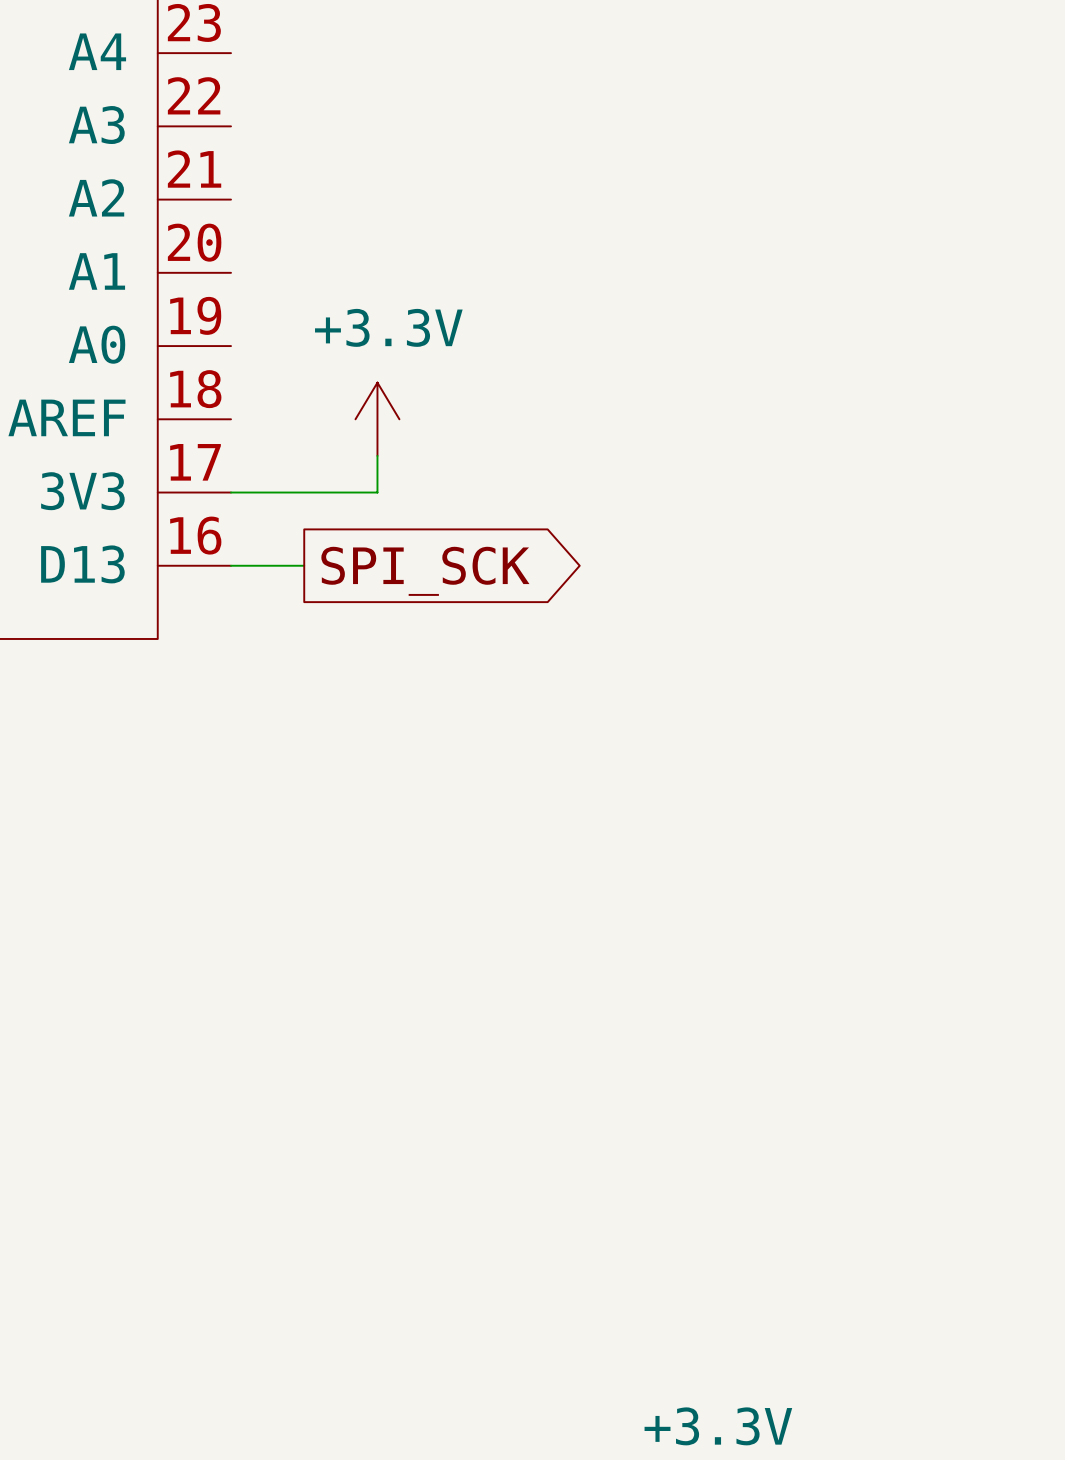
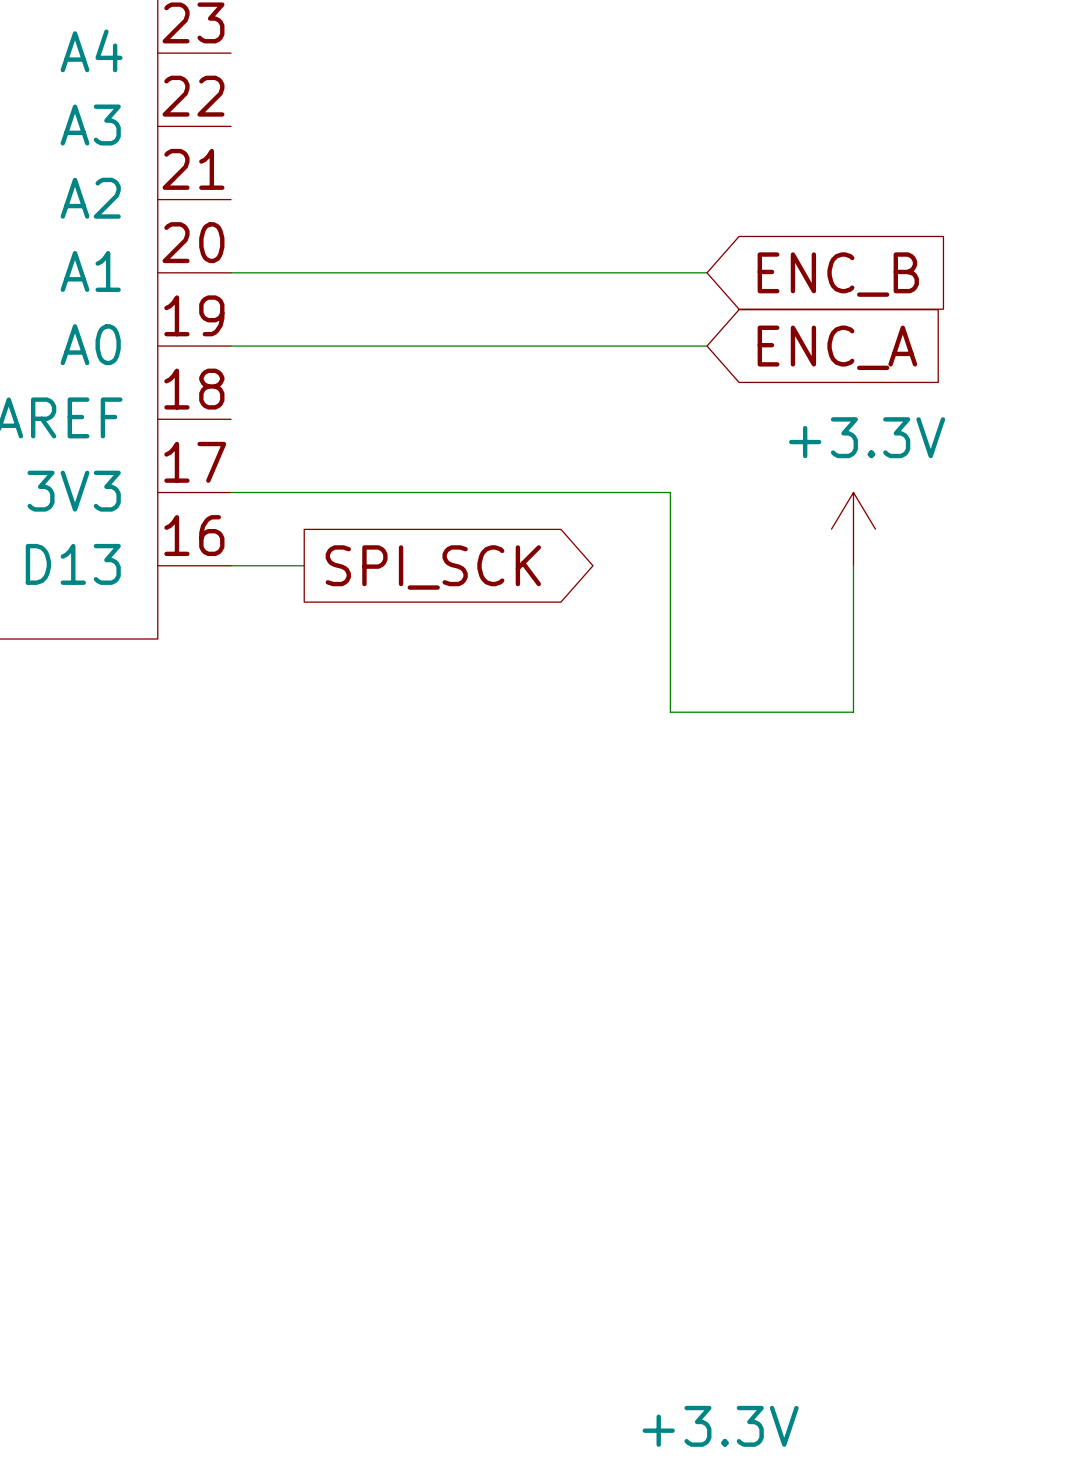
wire: none -> (231, 272) (707, 272)
global label: none -> ENC_B (838, 274)
wire: none -> (231, 346) (707, 346)
global label: none -> ENC_A (837, 347)
power symbol position: +3.3V (377, 419) -> +3.3V (853, 529)
wire: (377, 455) (377, 492) -> (853, 565) (853, 712) (670, 712) (670, 492) (377, 492)

